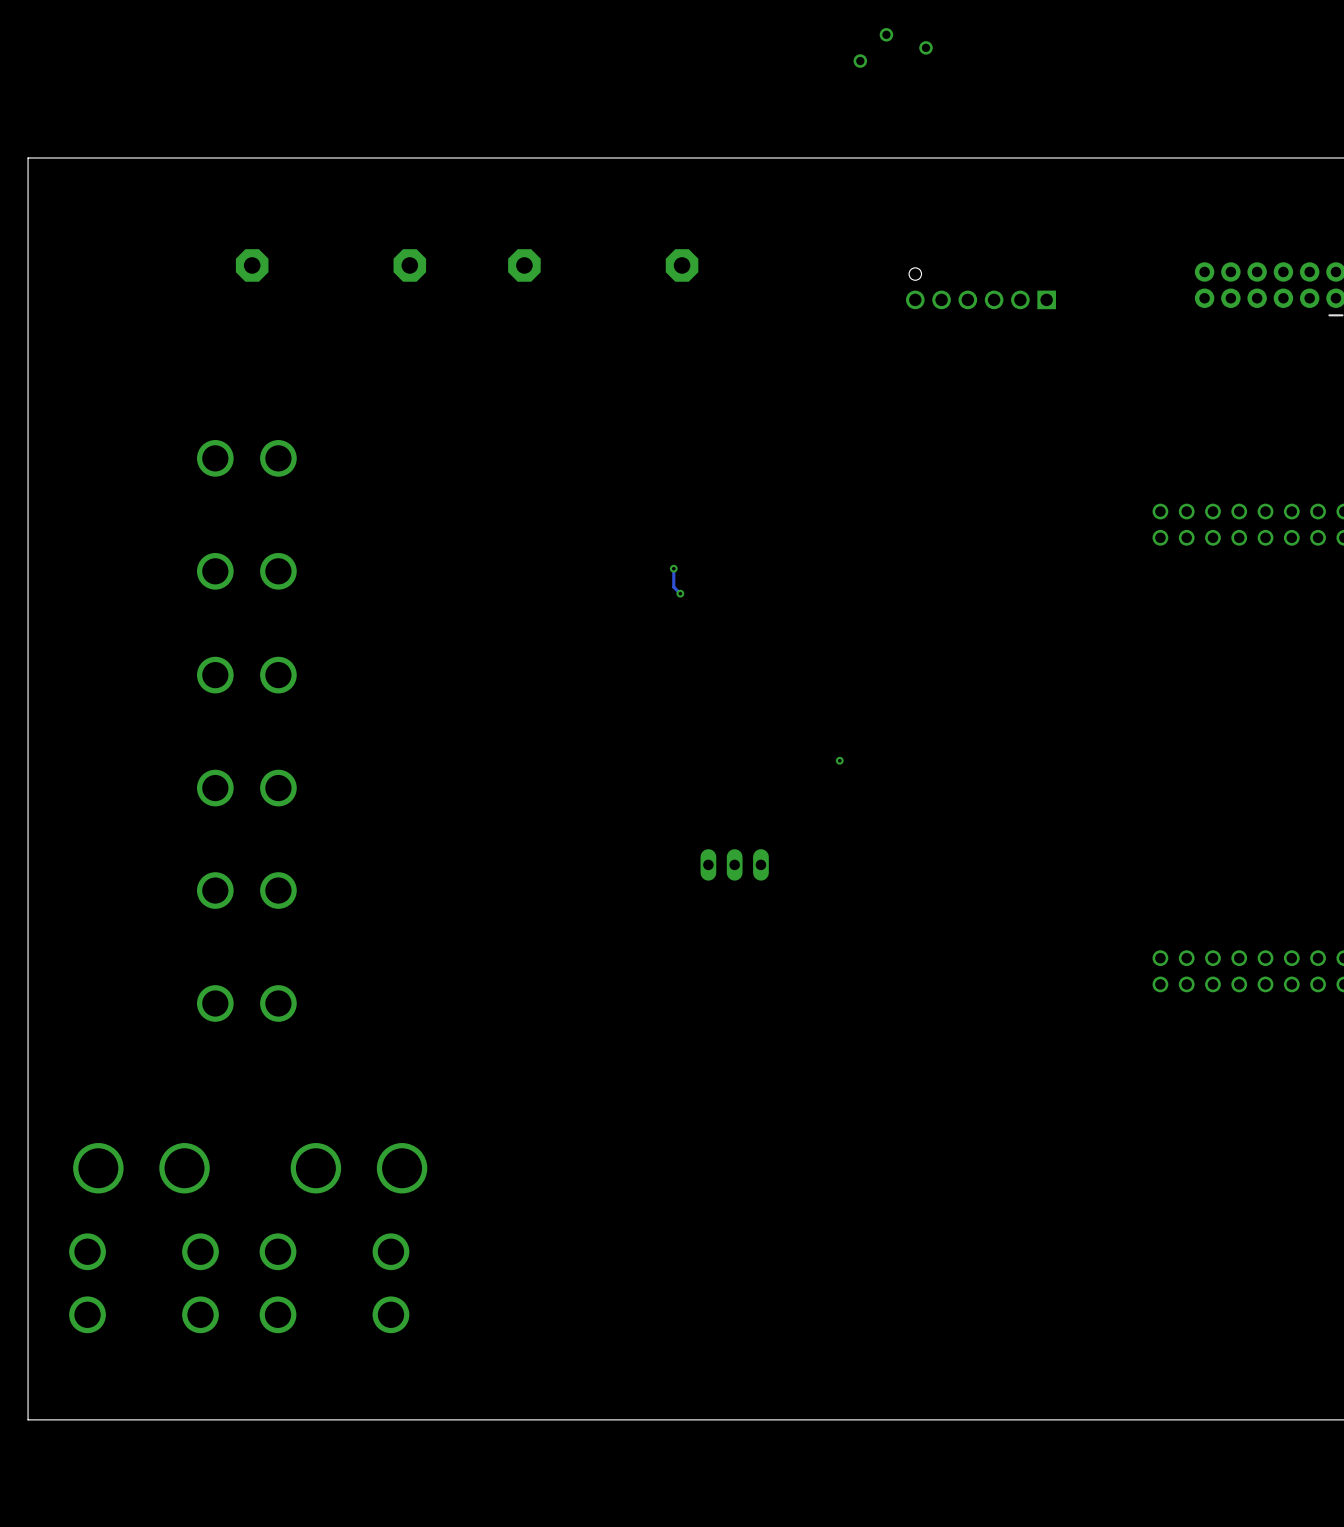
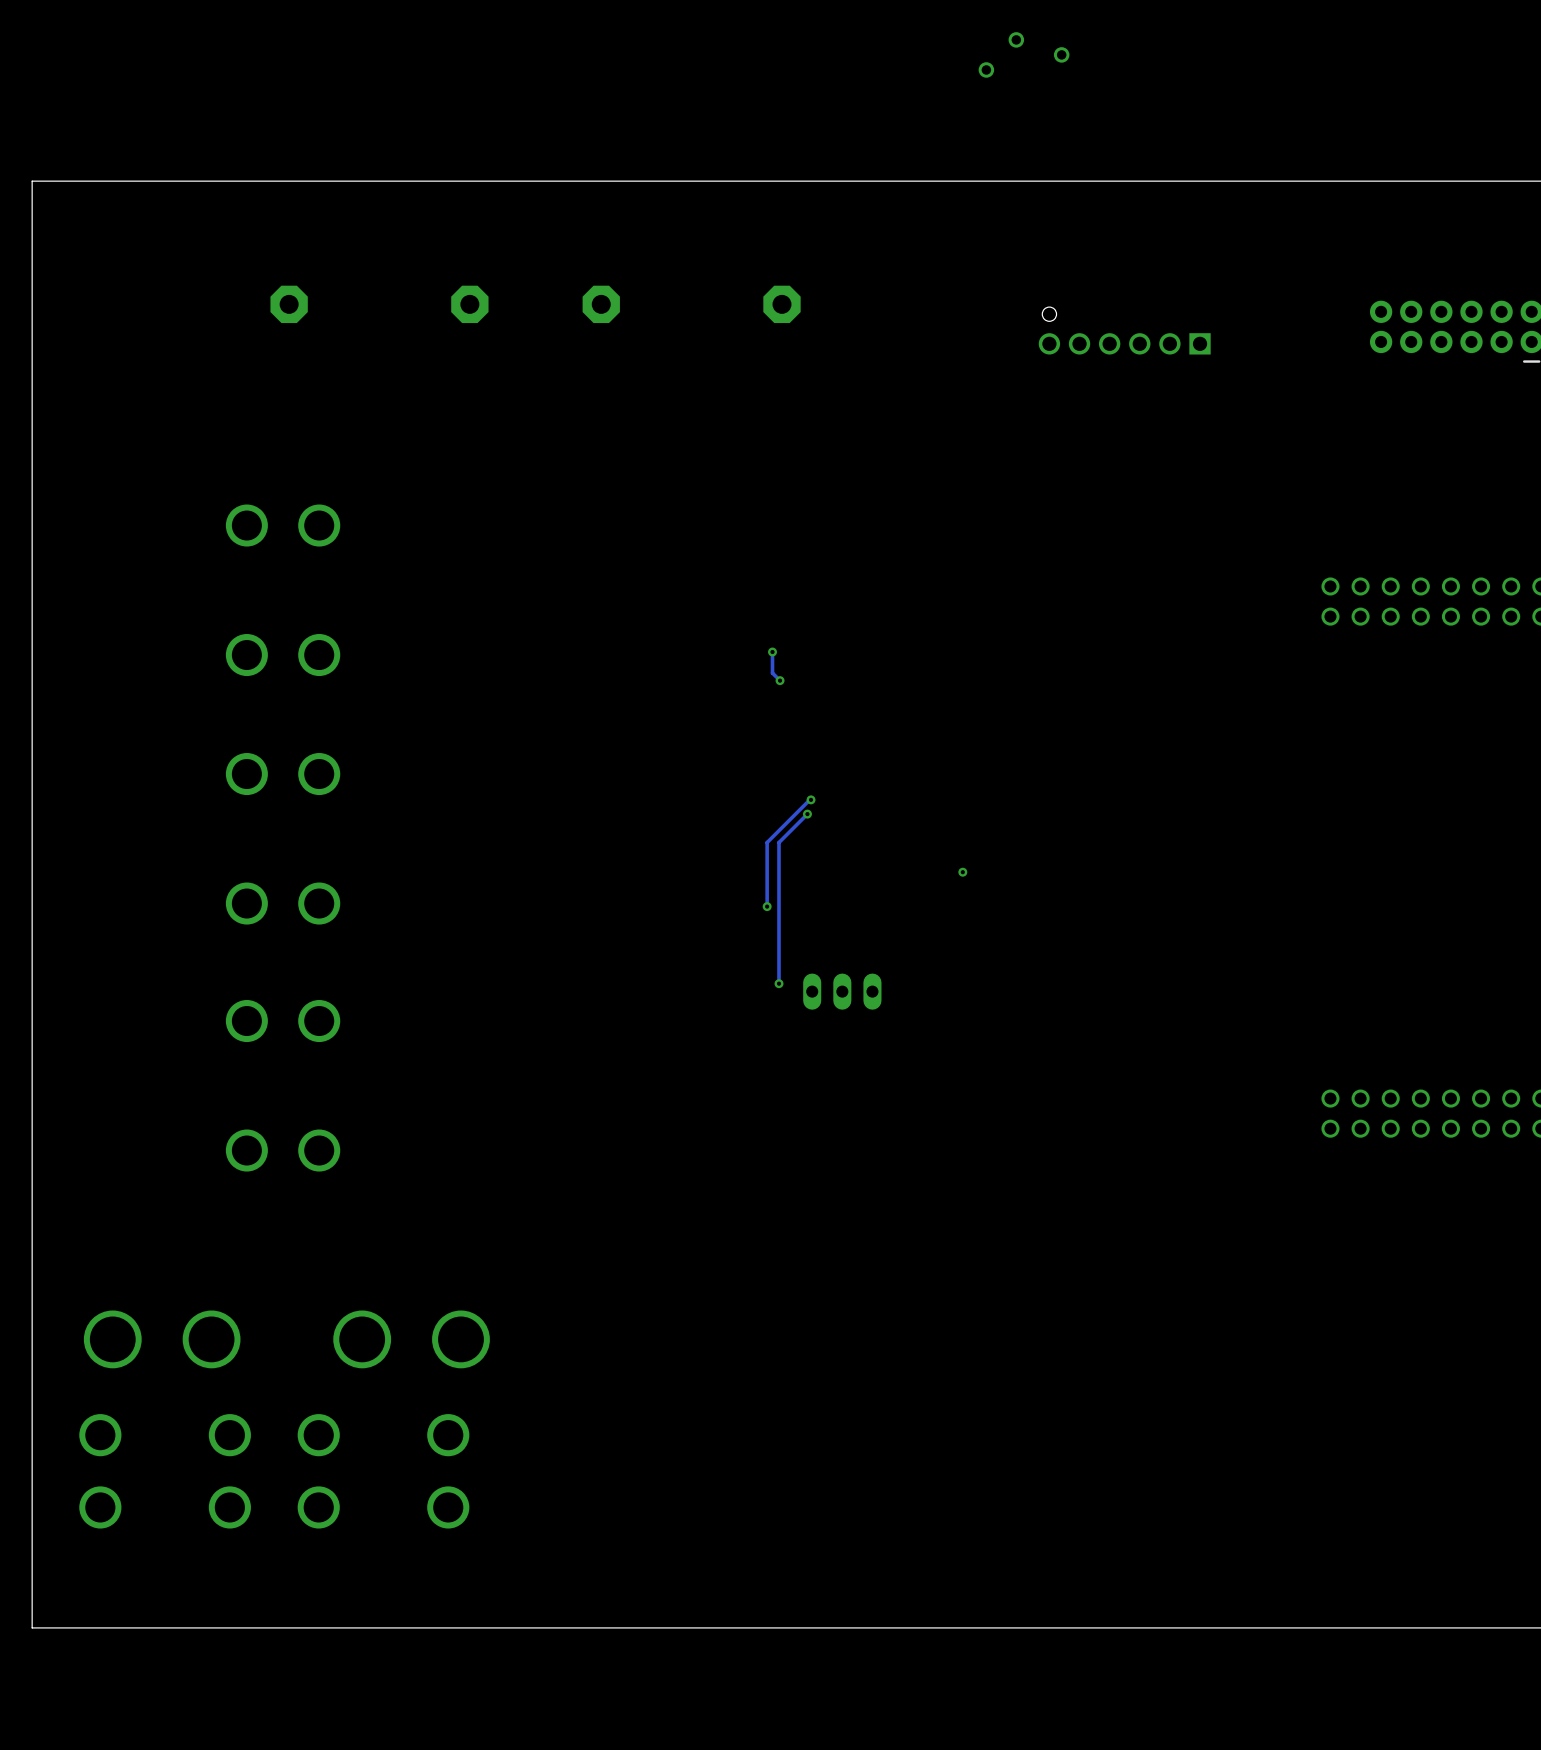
track: none -> (811, 799) (767, 842) (767, 906)
via: none -> (811, 799)
track: none -> (807, 814) (779, 842) (779, 983)
via: none -> (807, 814)
via: none -> (767, 906)
via: none -> (779, 983)

